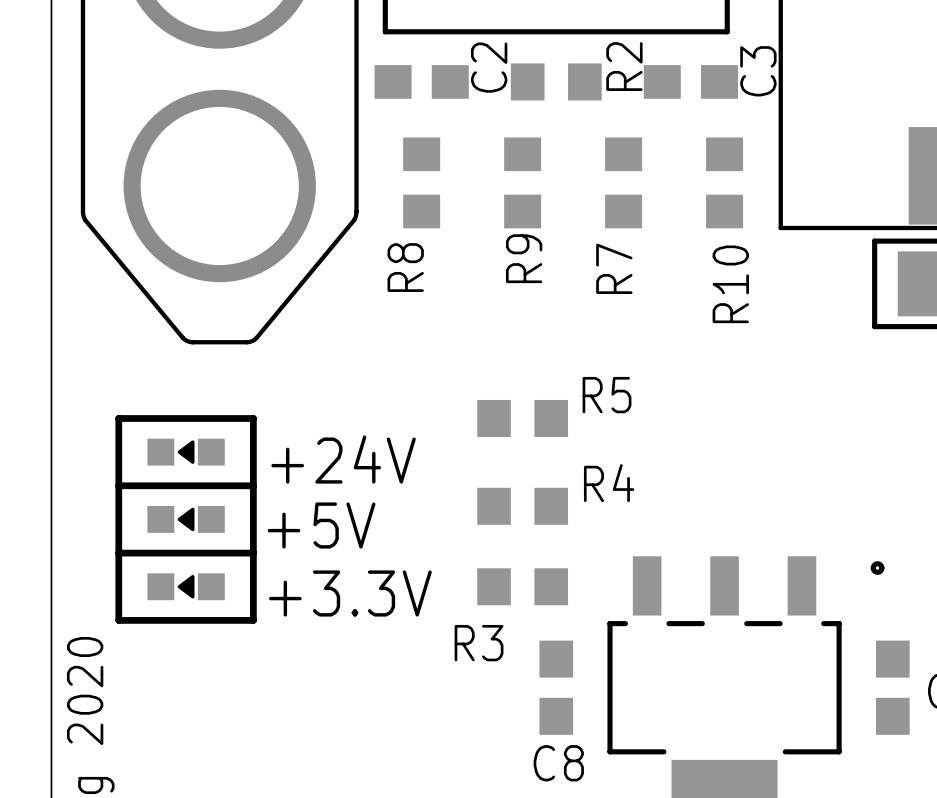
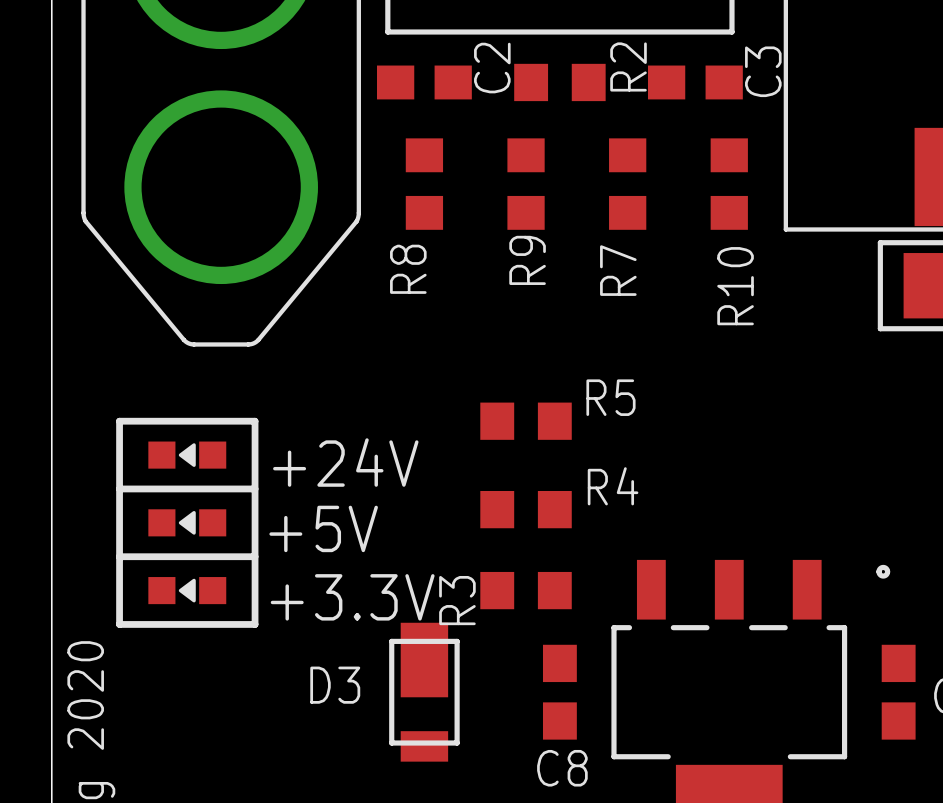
R3 name rotation: 0° (479, 643) -> 90° counterclockwise (457, 600)
D3: none -> (424, 692)

